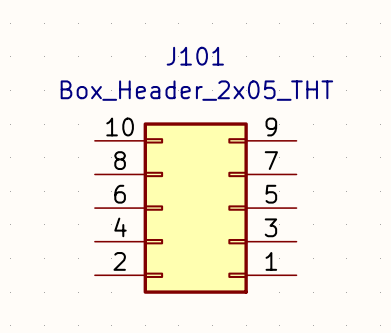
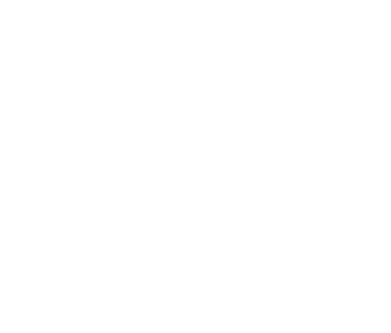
J101: Box_Header_2x05_THT (195, 208) -> none

